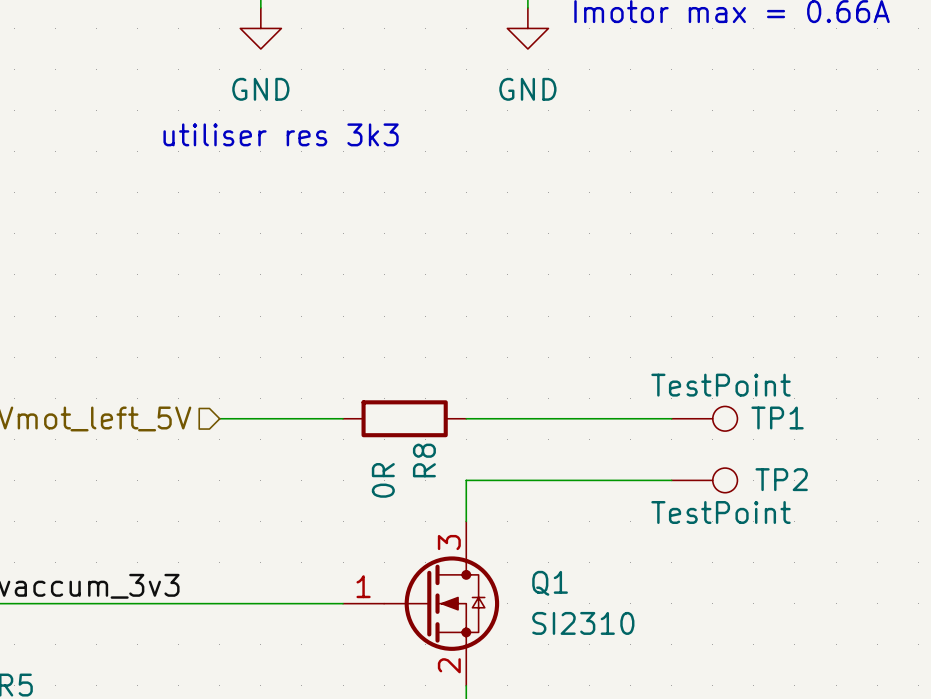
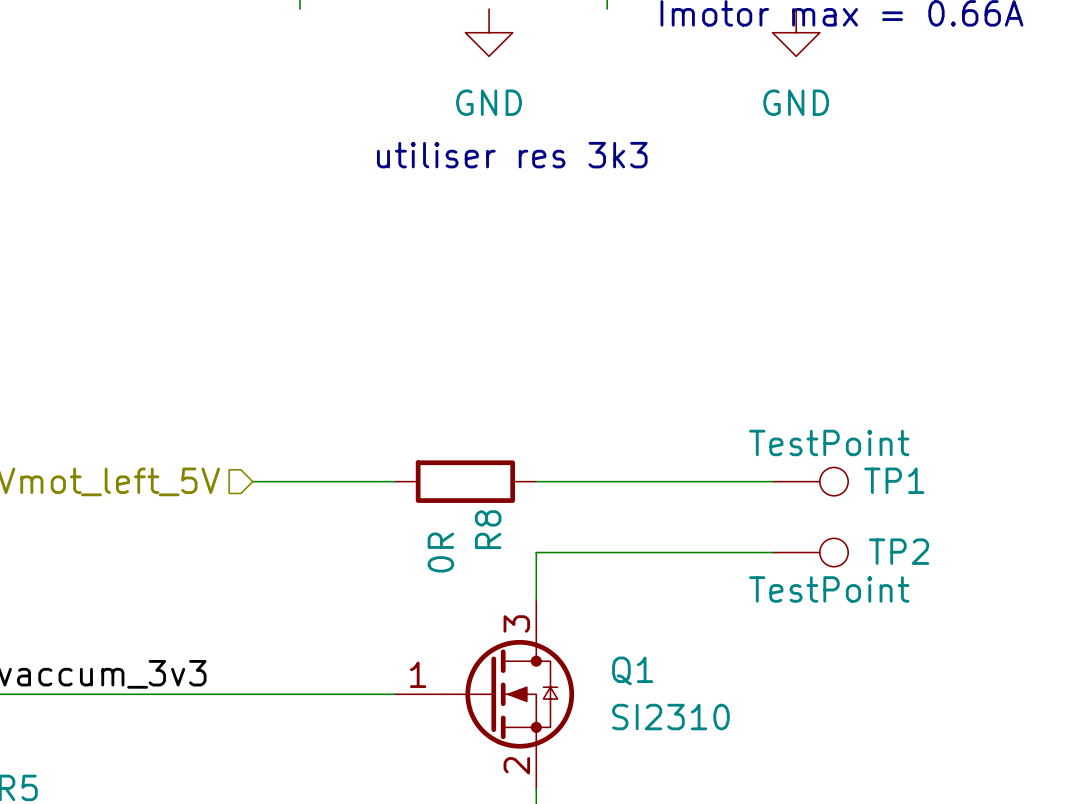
power symbol: GND (260, 28) -> none
power symbol: none -> GND (489, 32)
power symbol: GND (527, 28) -> none
power symbol: none -> GND (796, 32)
text position: utiliser res 3k3 (281, 134) -> utiliser res 3k3 (512, 155)

